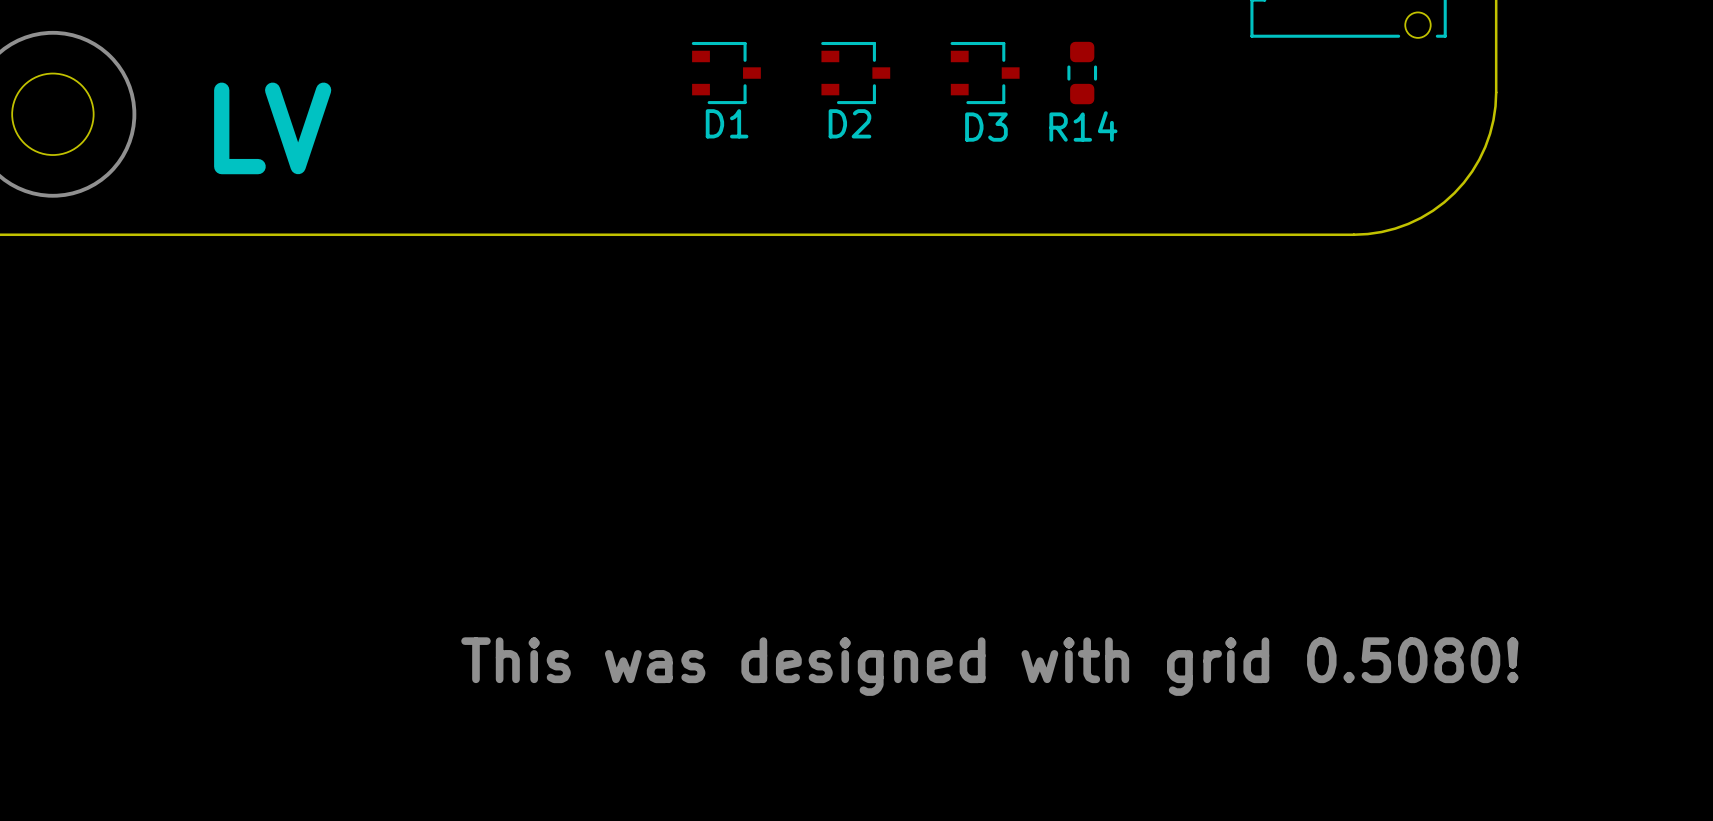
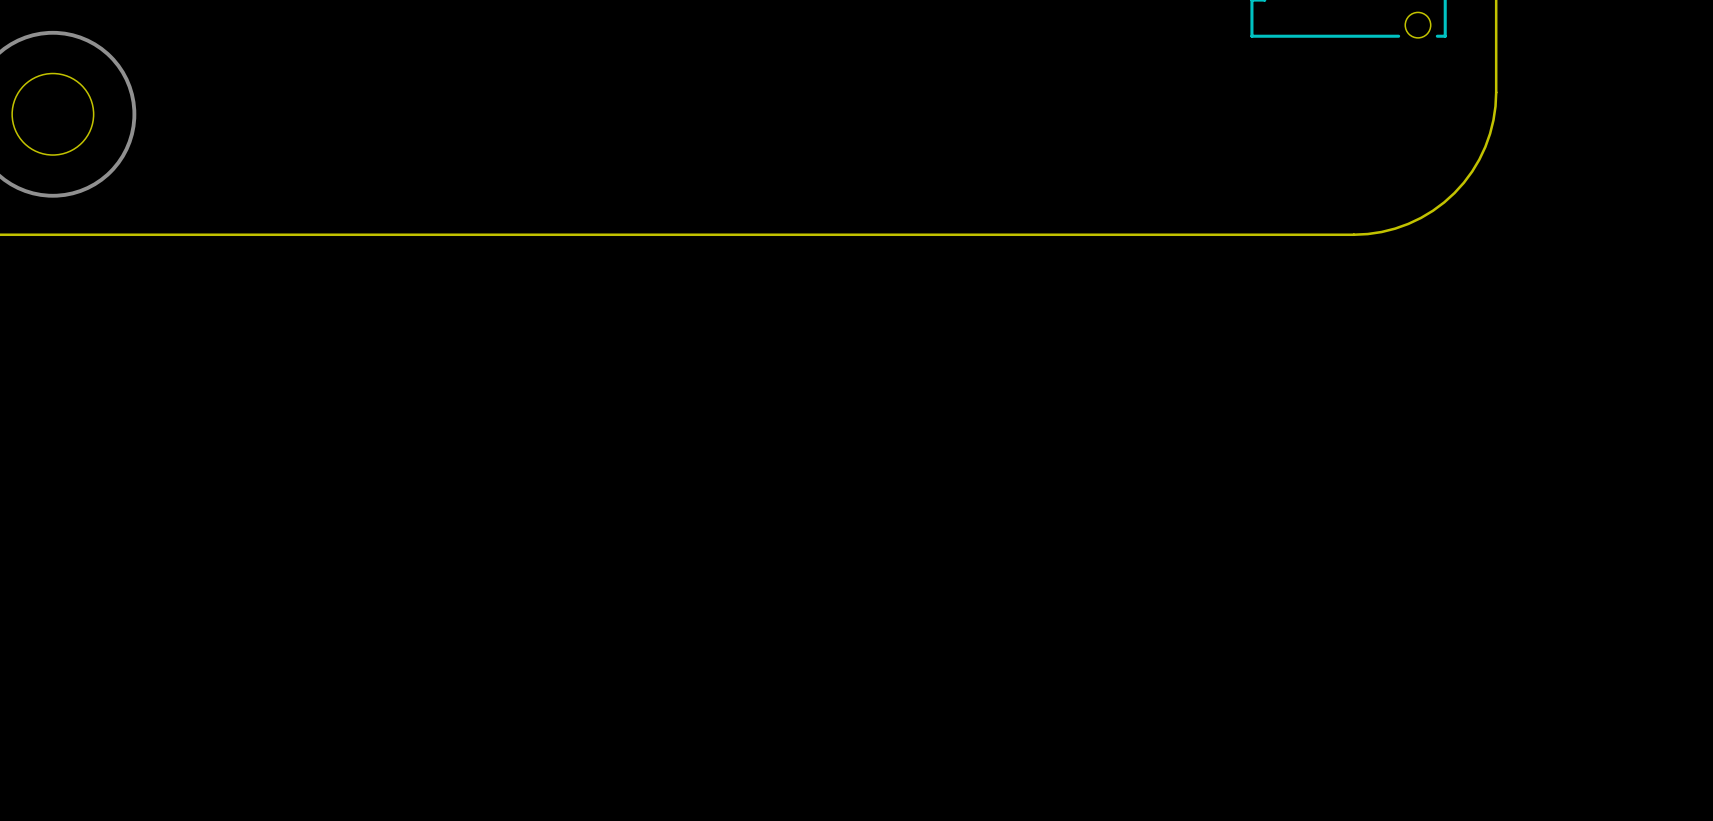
D1: (726, 73) -> none
D2: (855, 73) -> none
D3: (985, 73) -> none
R14: (1082, 73) -> none
text: LV (272, 128) -> none
text: This was designed with grid 0.5080! (989, 666) -> none

